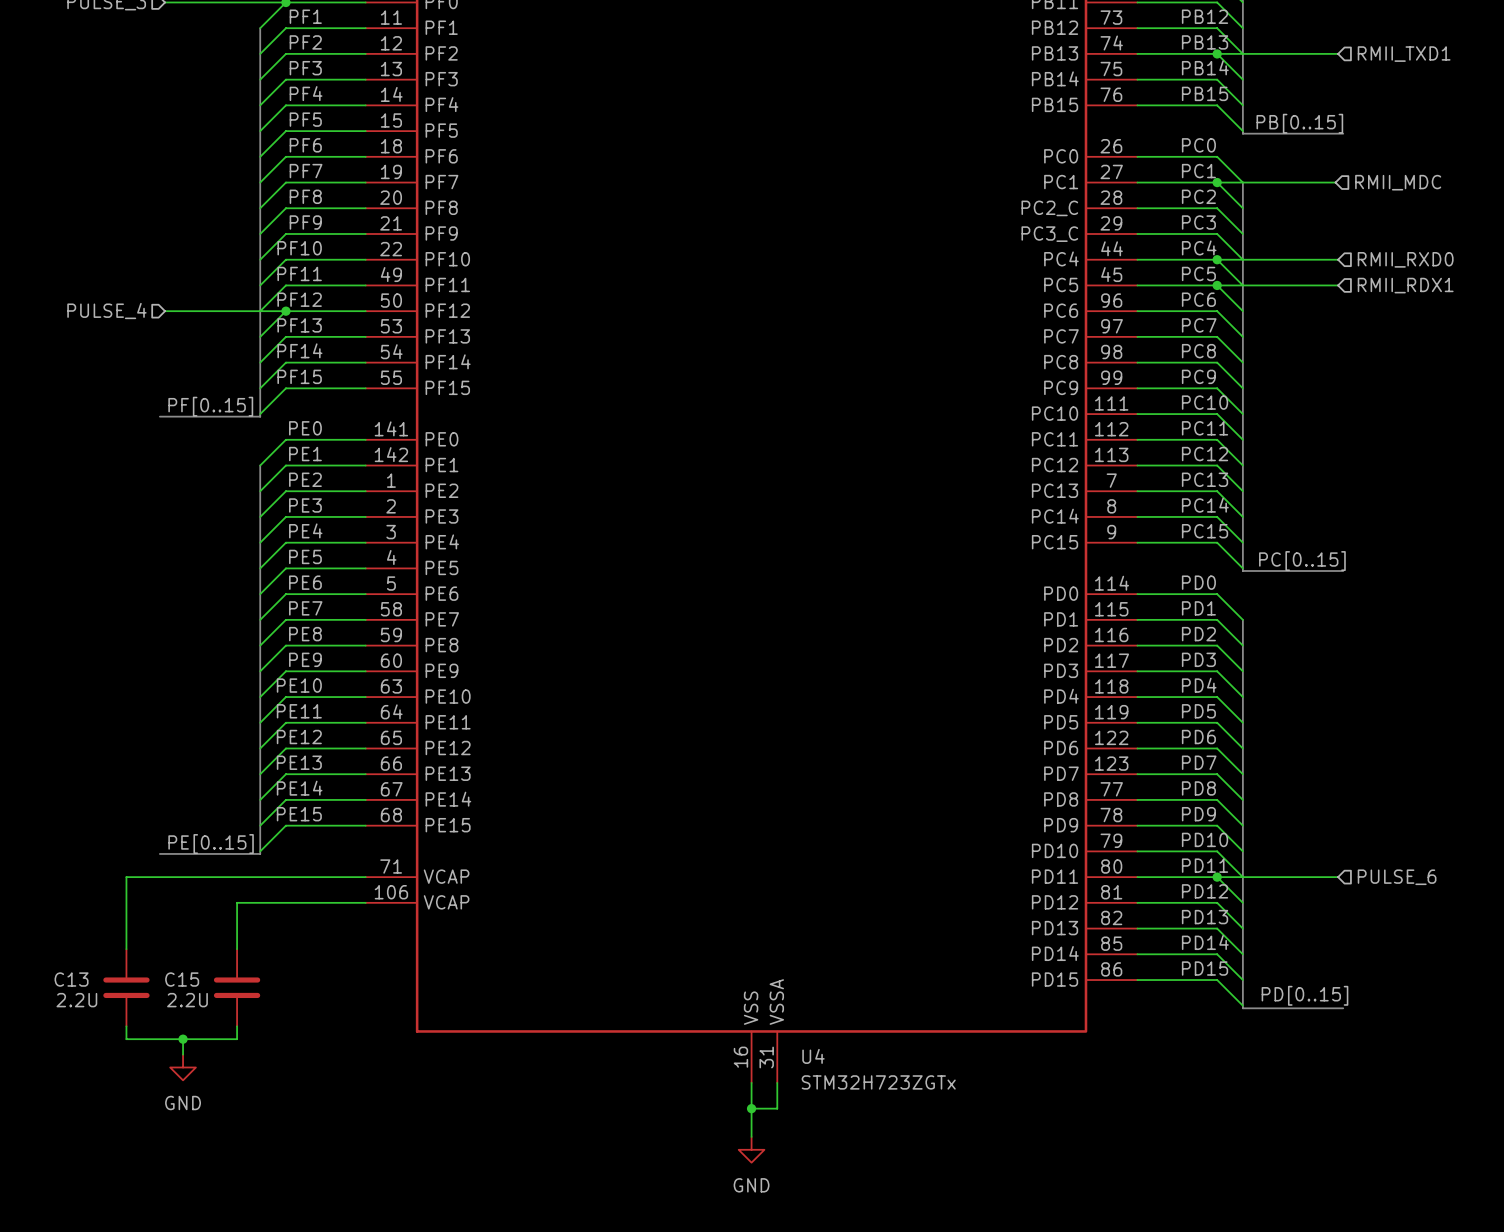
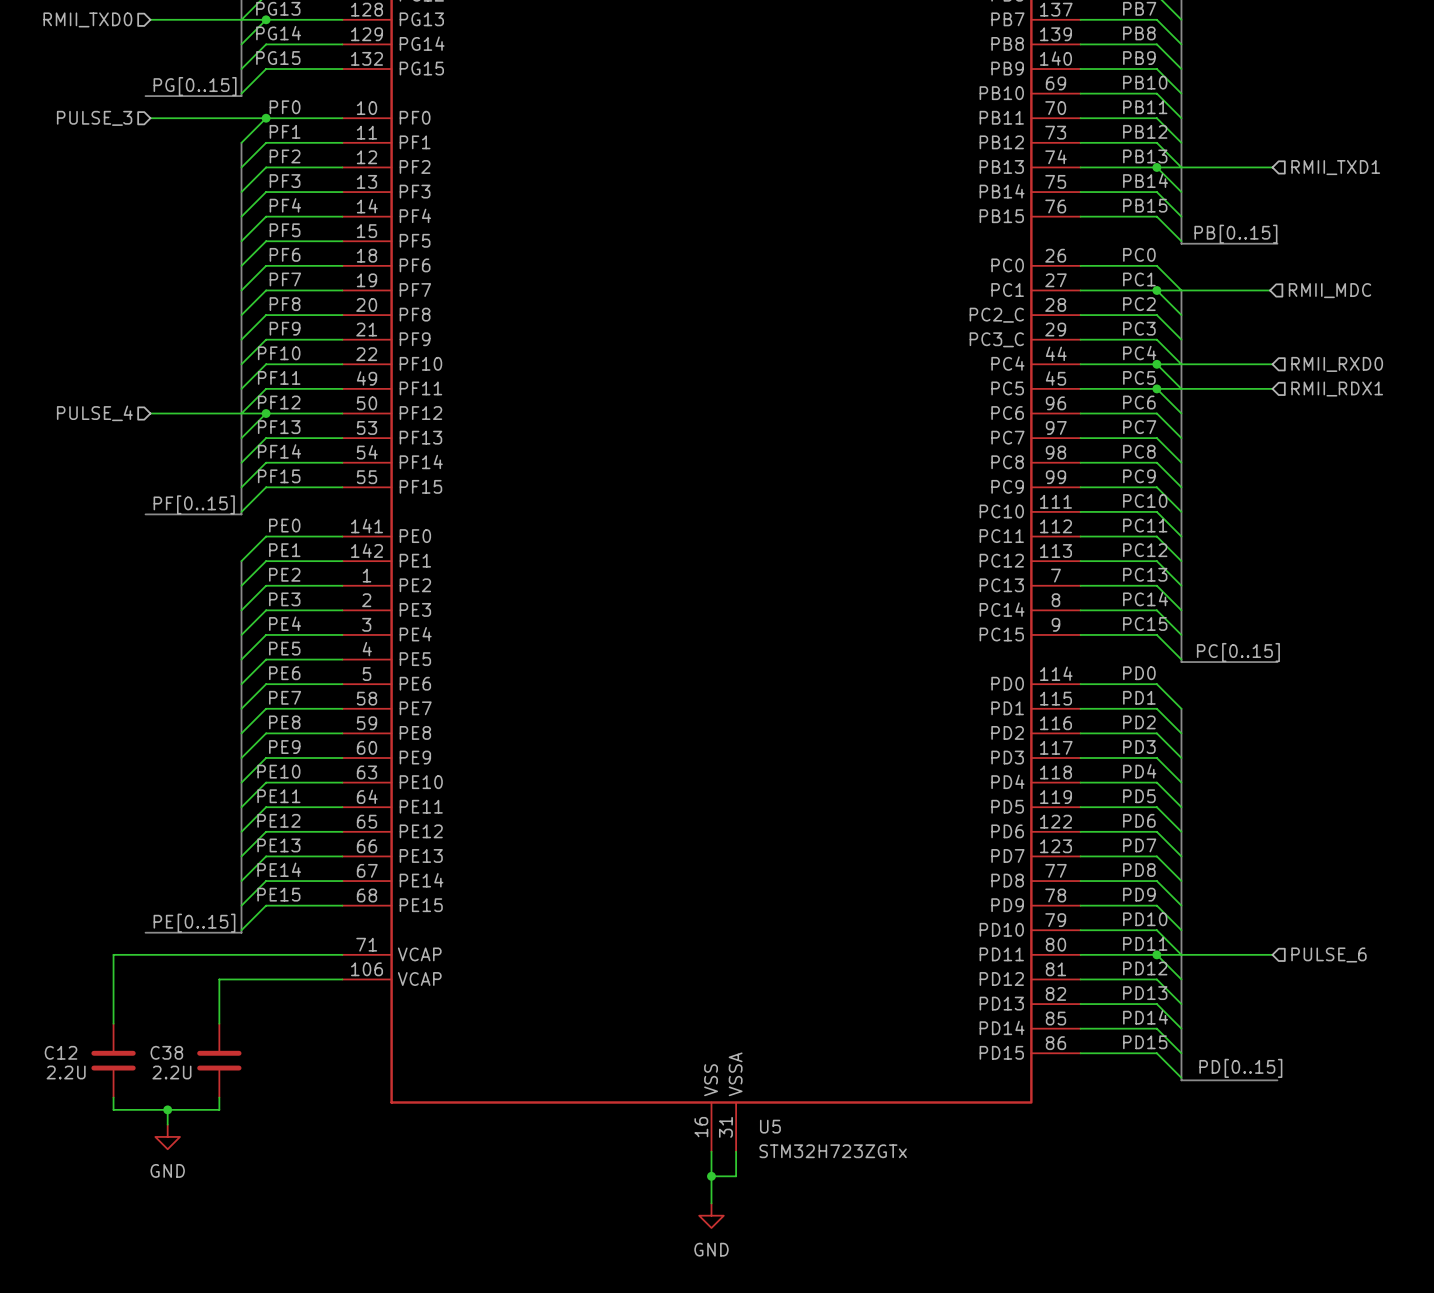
C13 name: C13 (71, 979) -> C12 (61, 1052)
C15 name: C15 (182, 979) -> C38 (166, 1052)
U4 name: U4 (813, 1056) -> U5 (770, 1126)

